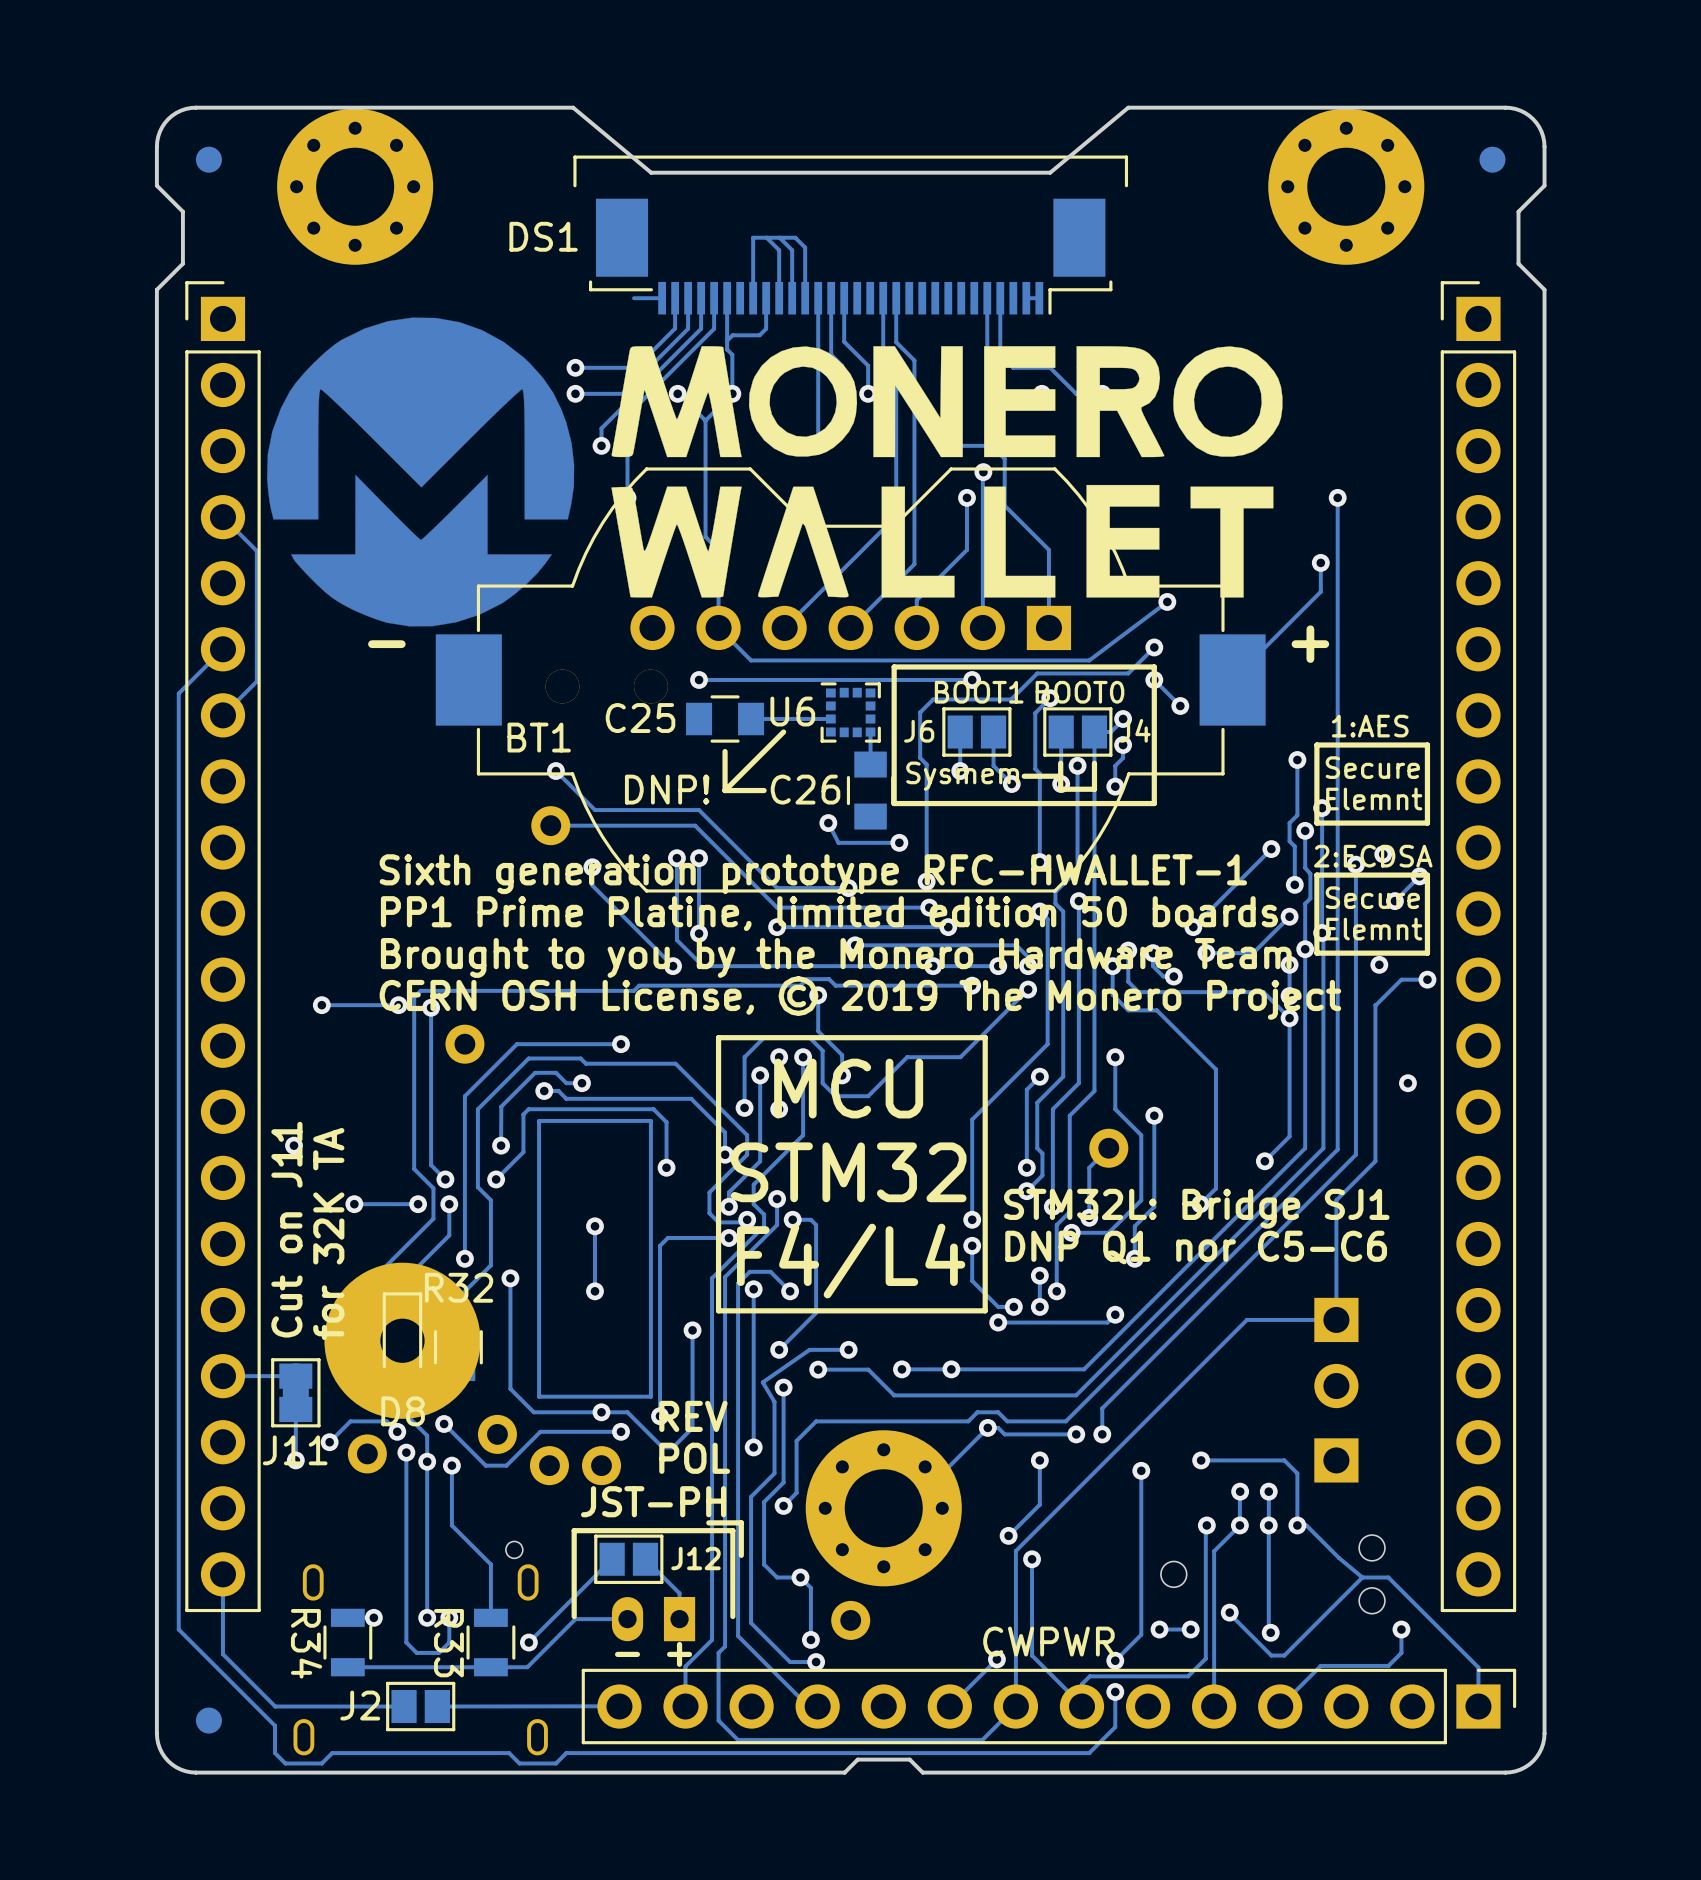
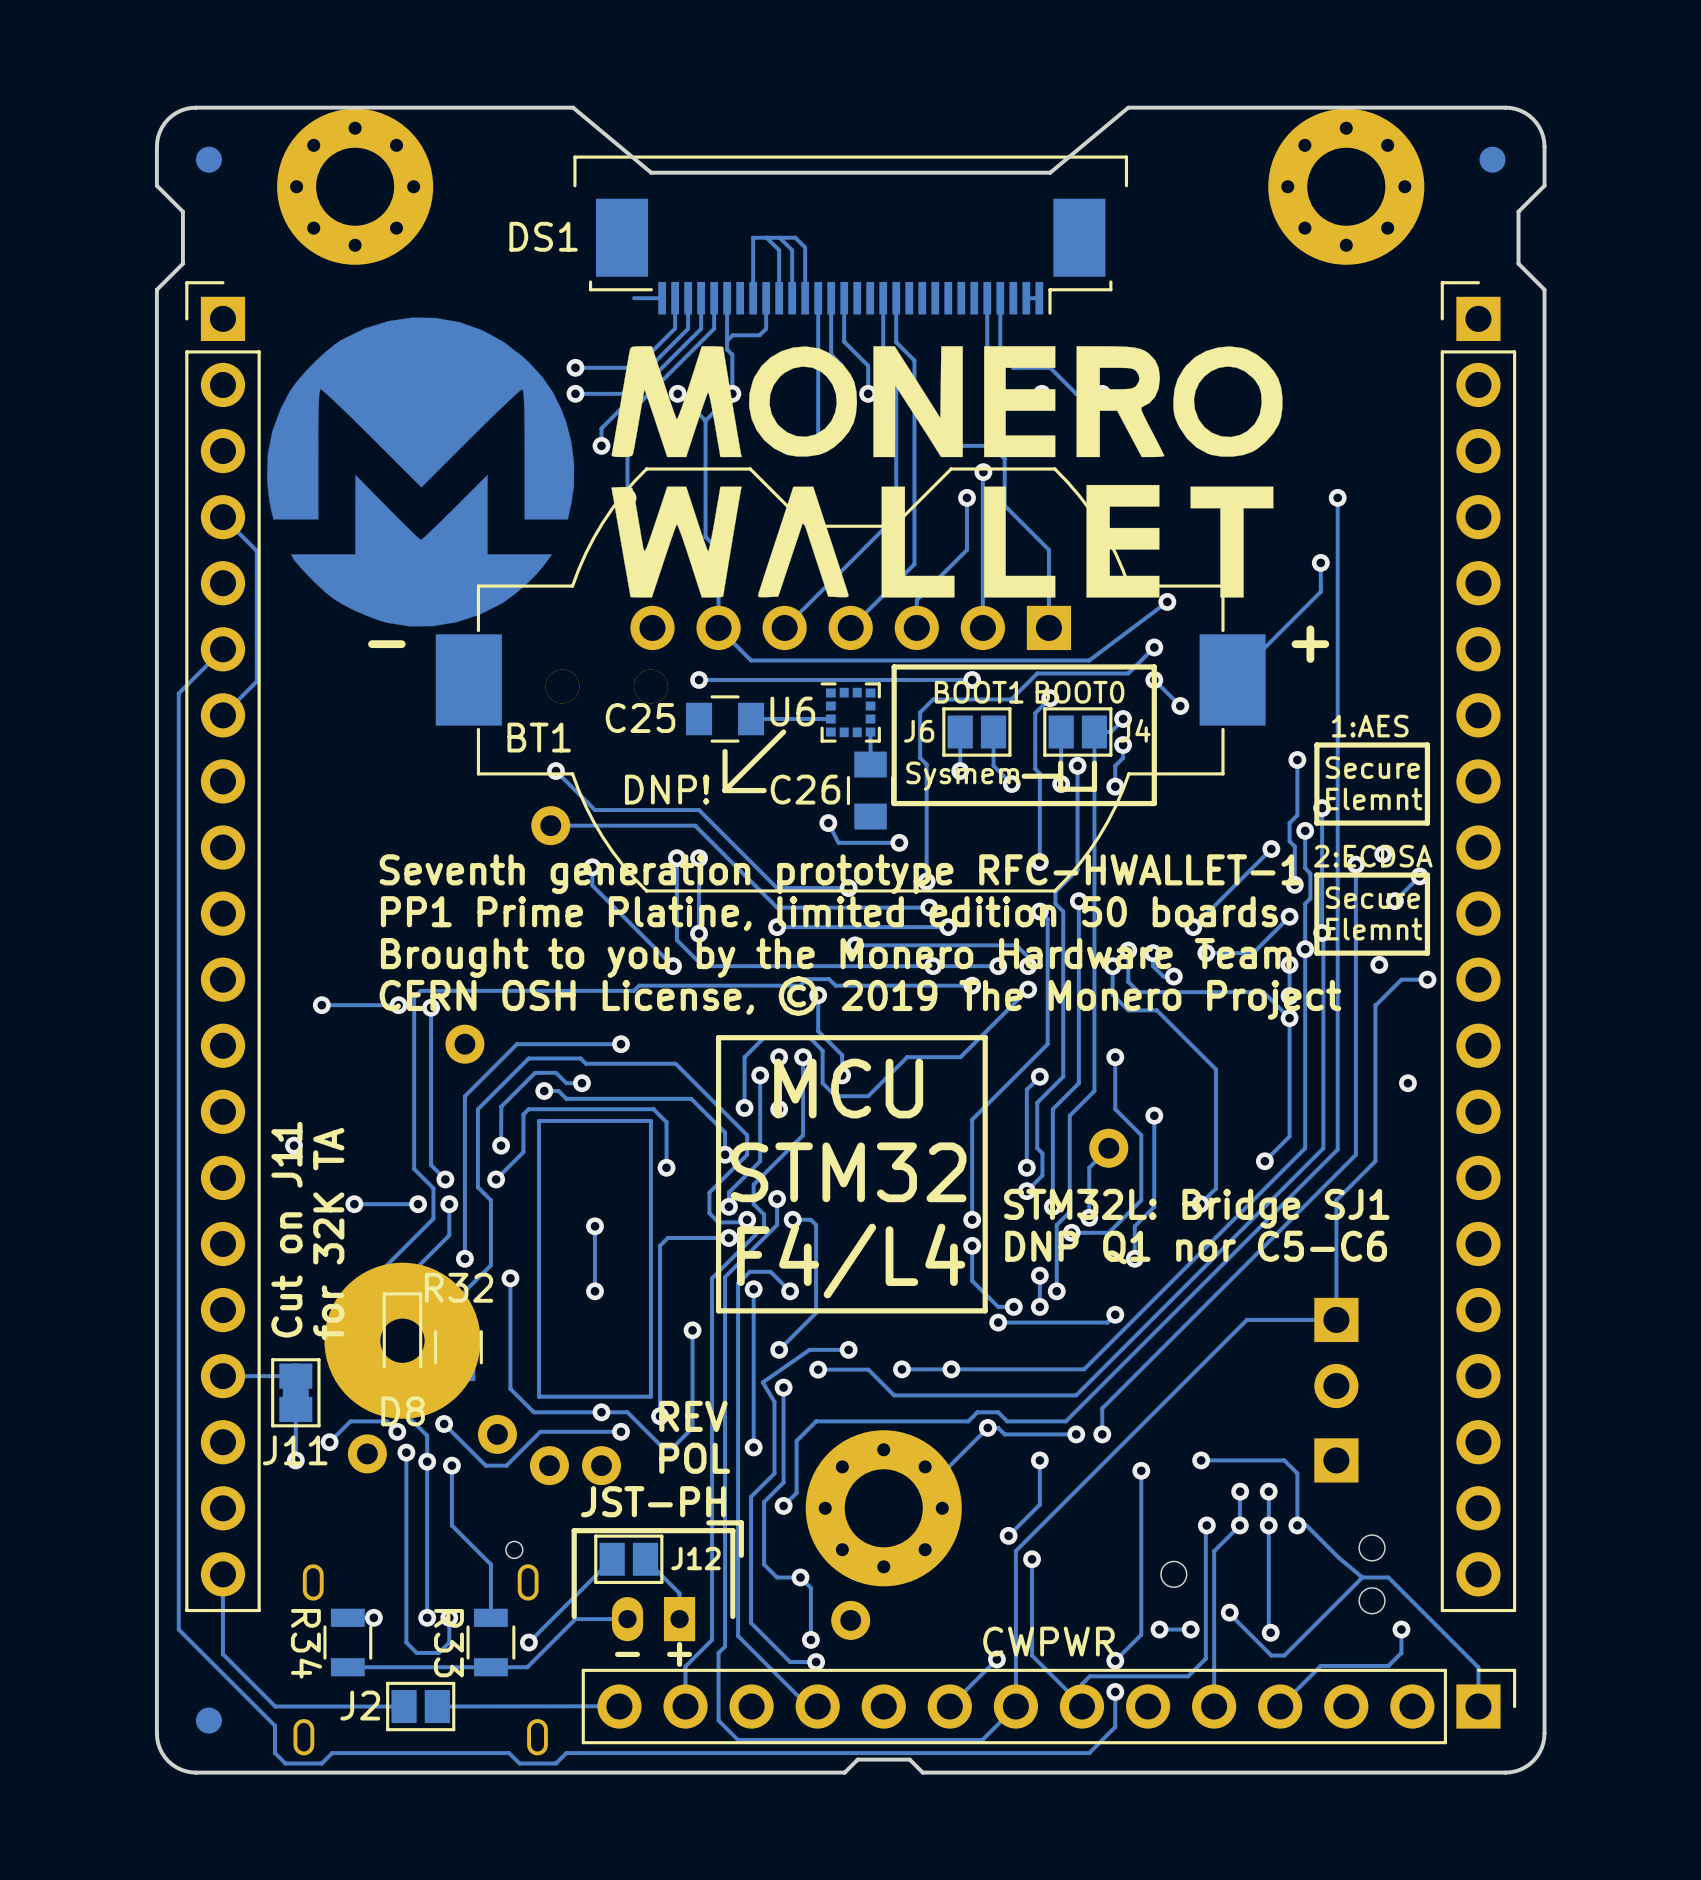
text: Sixth generation prototype RFC-HWALLET-1 (813, 874) -> Seventh generation prototype RFC-HWALLET-1 (840, 874)

